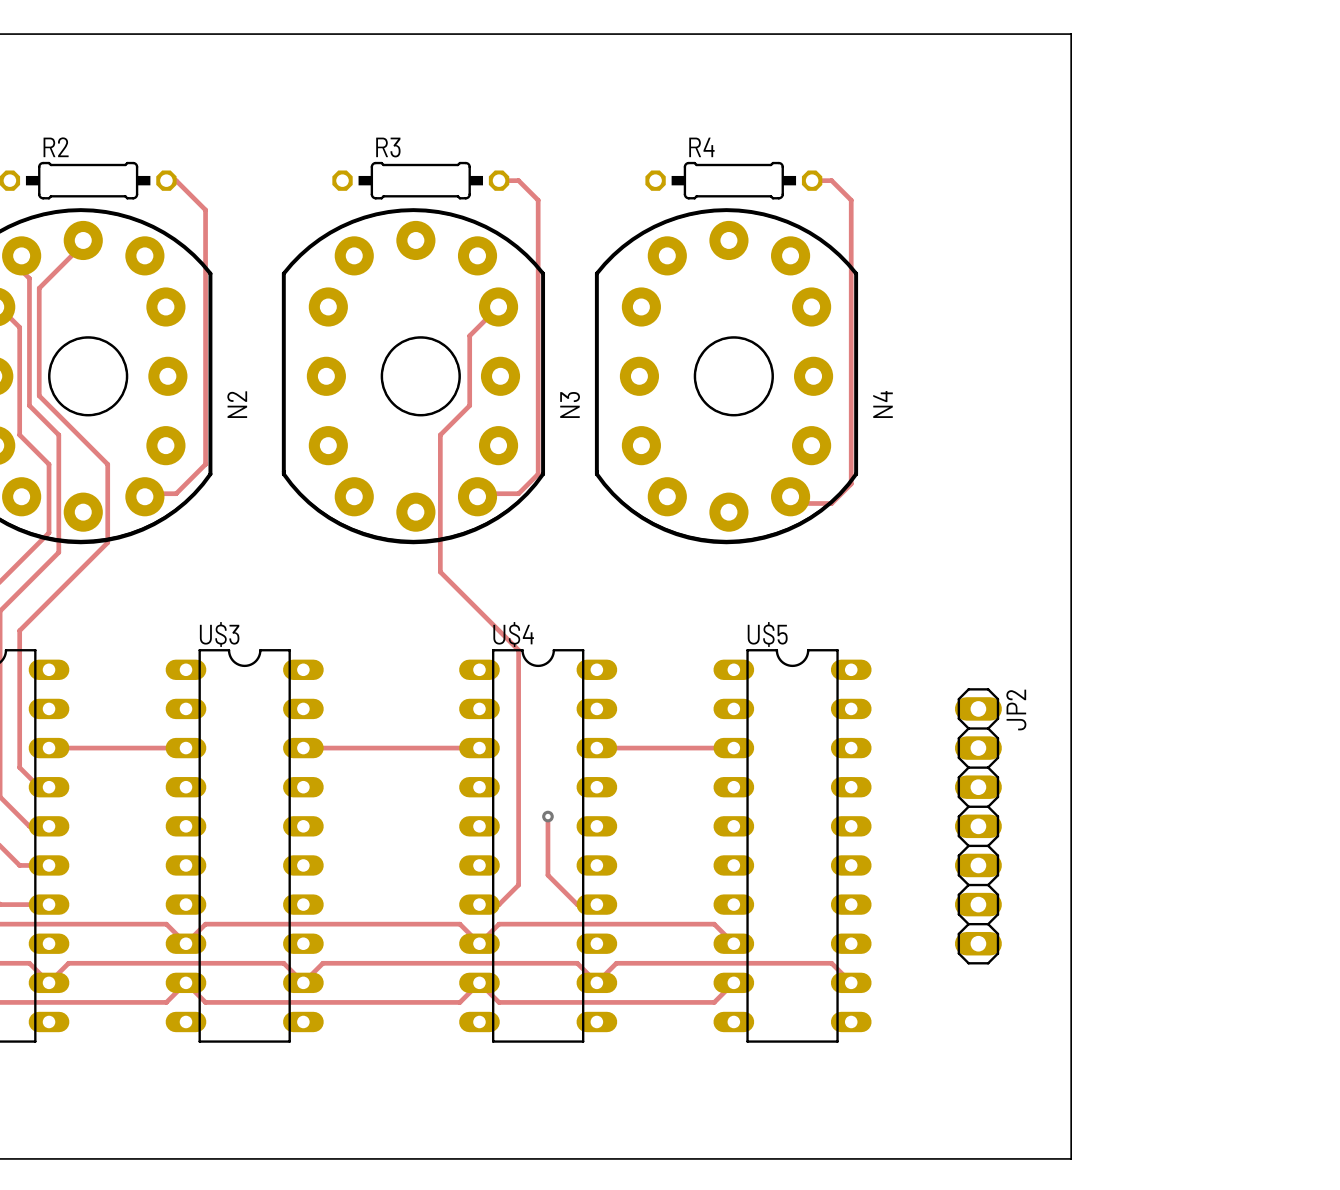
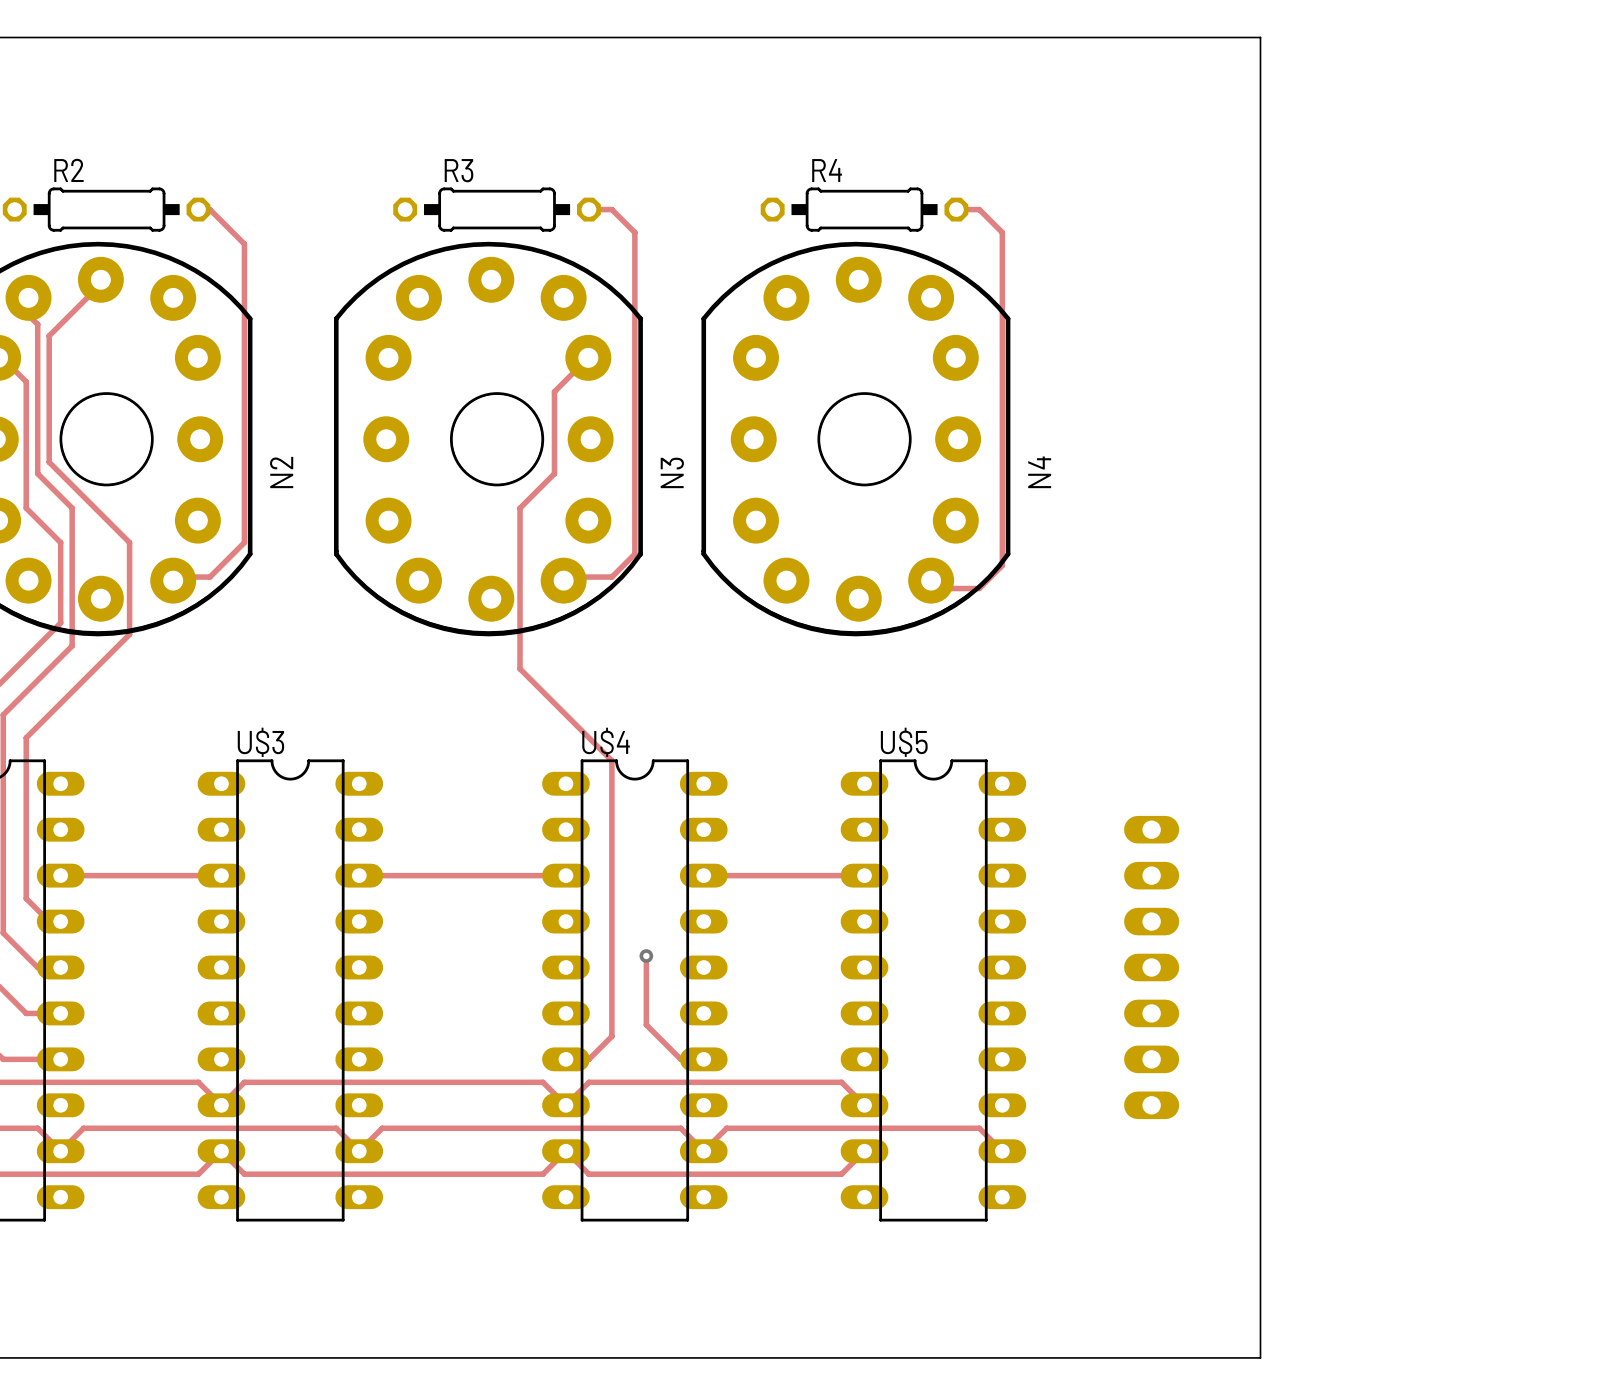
JP2 side: top (978, 826) -> bottom (1151, 967)

